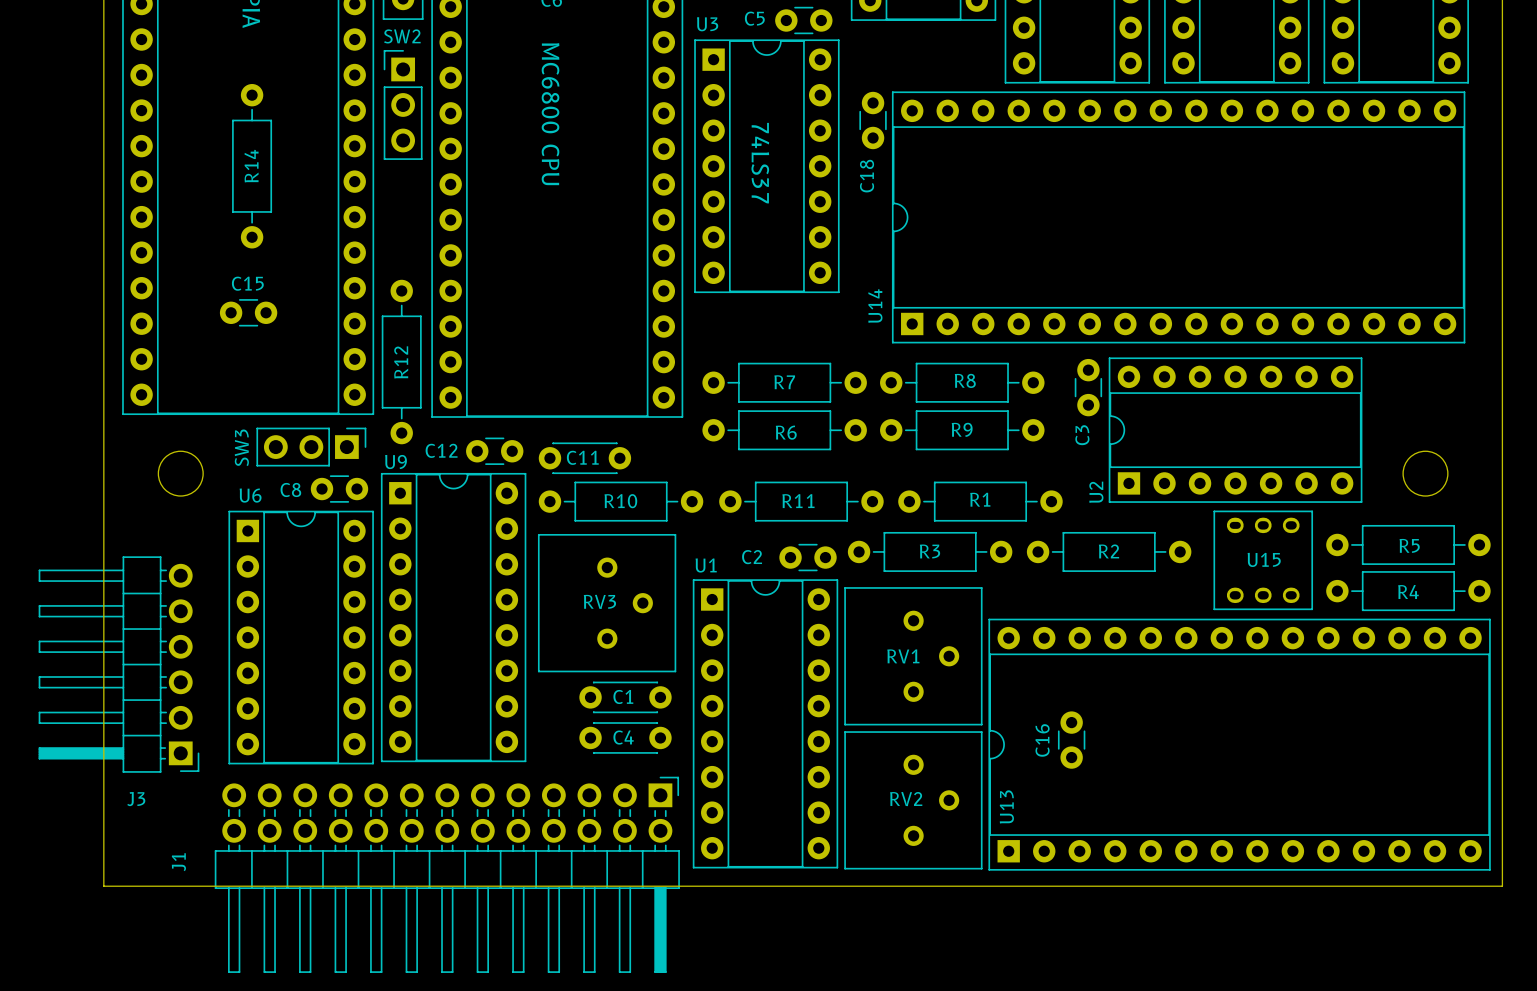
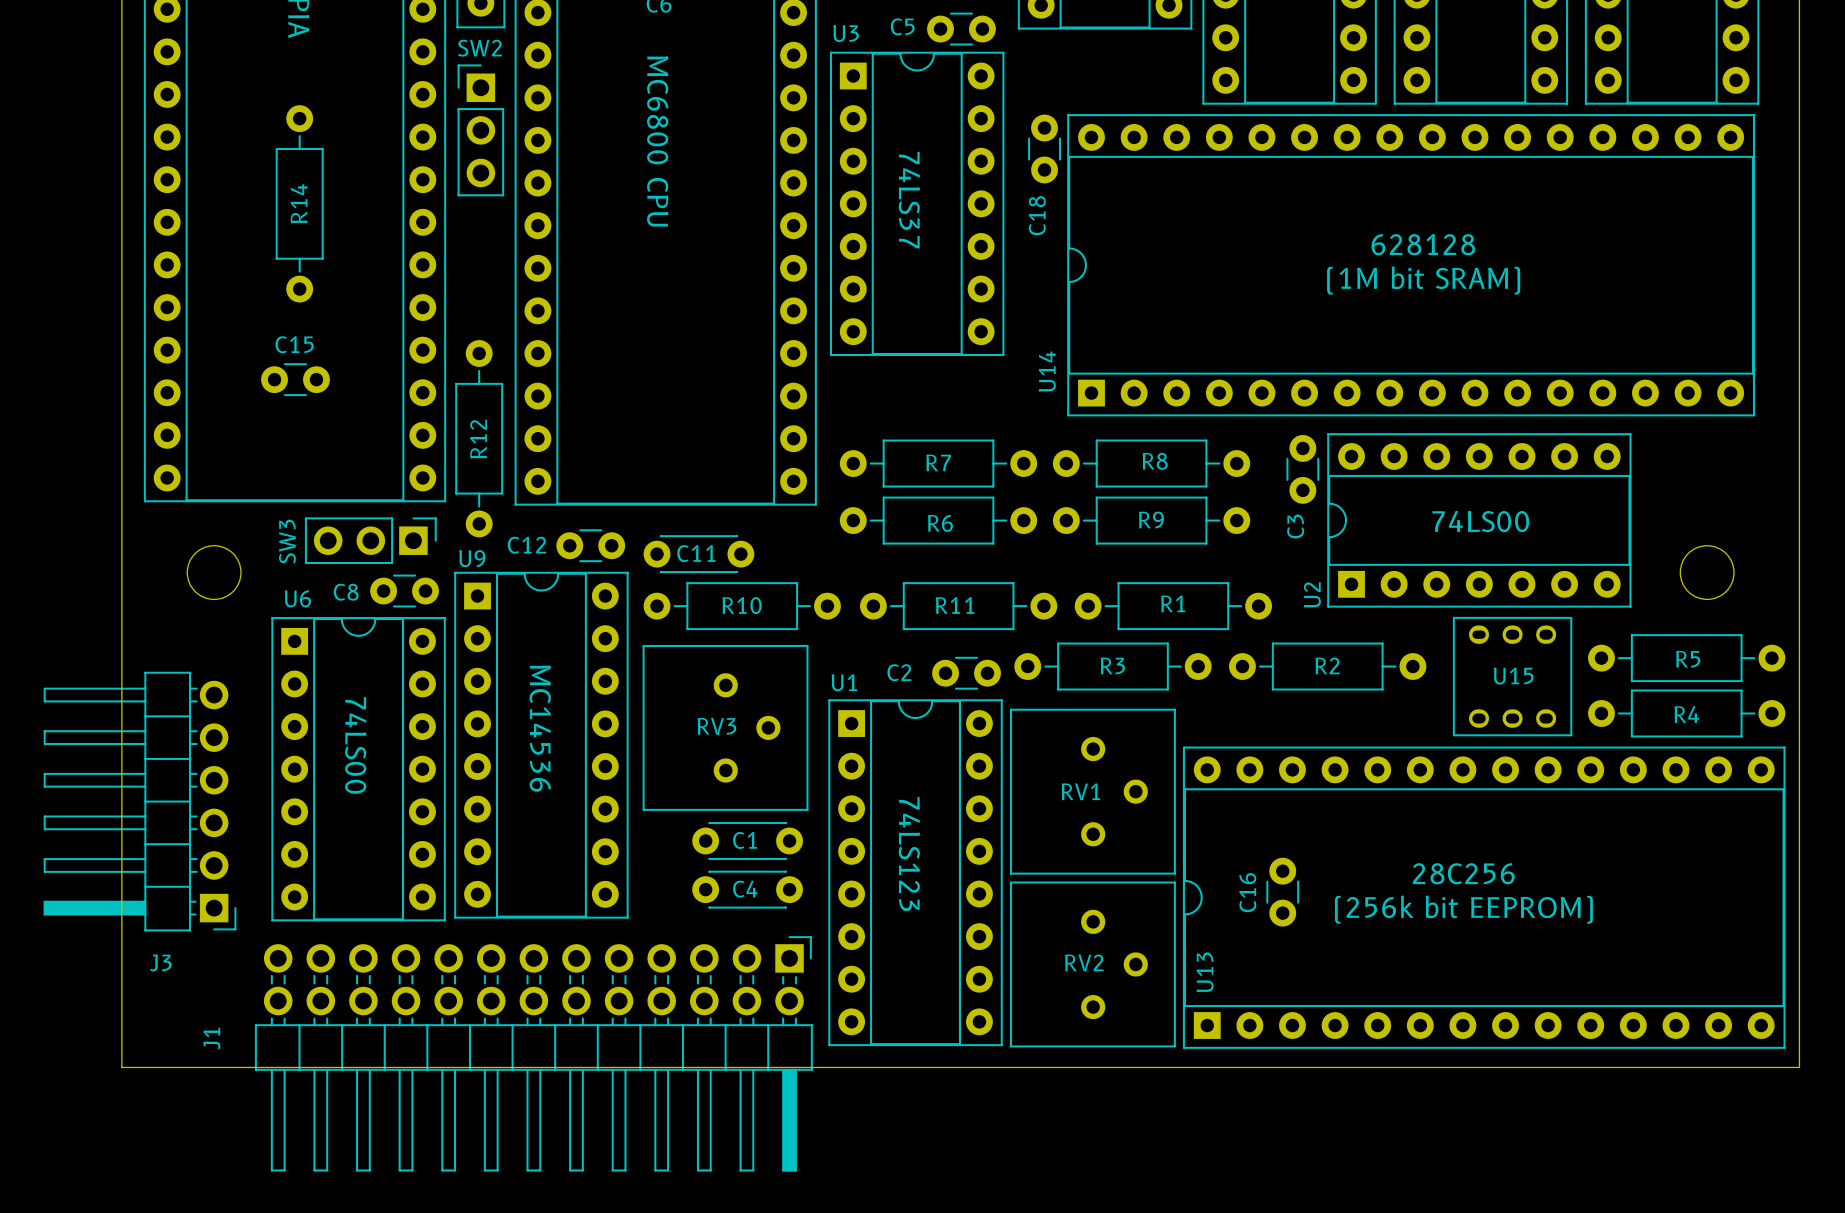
text: none -> 628128 (1423, 244)
text: none -> (1M bit SRAM) (1423, 280)
text: none -> 74LS00 (1480, 521)
text: none -> MC14536 (540, 728)
text: none -> 74LS00 (355, 745)
text: none -> 74LS123 (909, 854)
text: none -> 28C256 (1463, 873)
text: none -> (256k bit EEPROM) (1463, 909)

